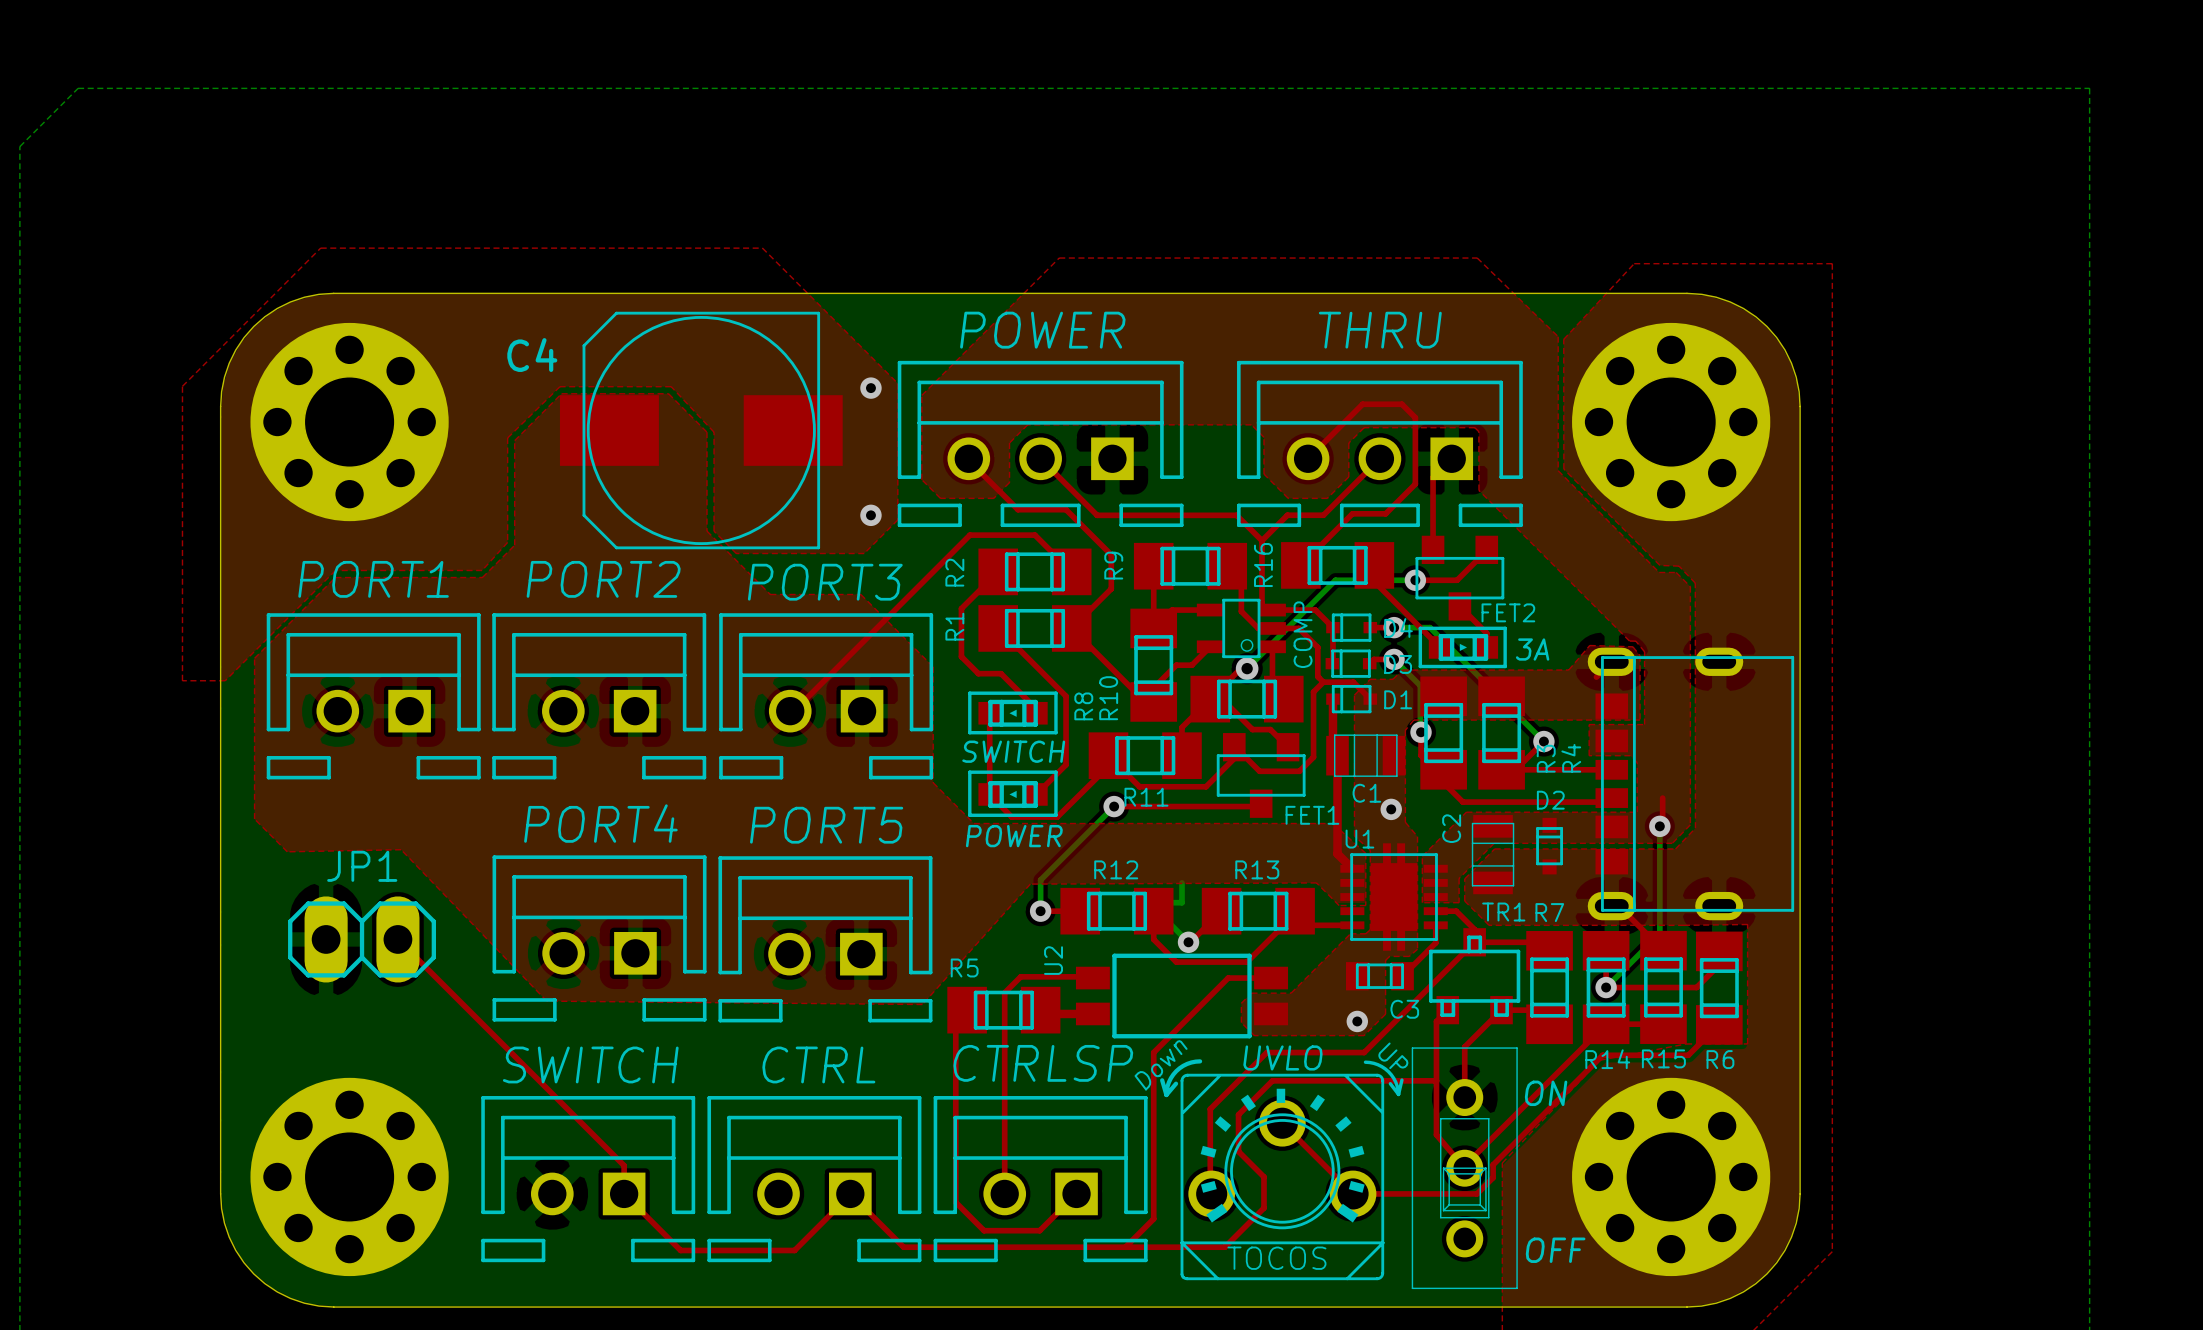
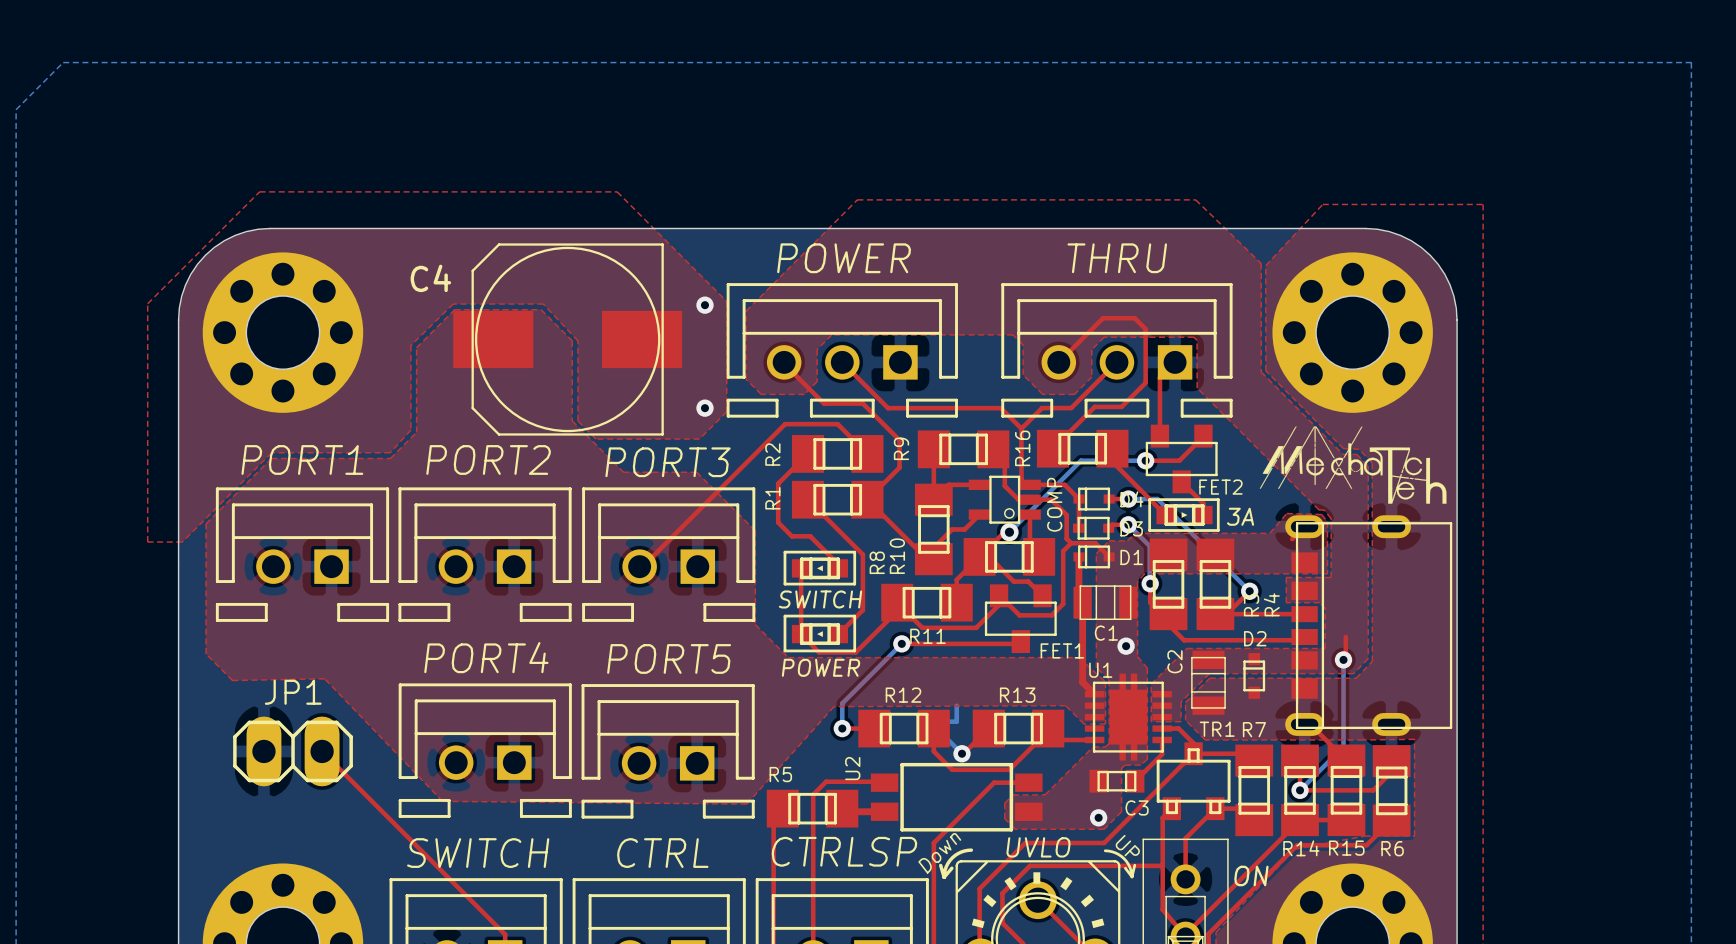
drawing: none -> [1259, 426, 1447, 504]

